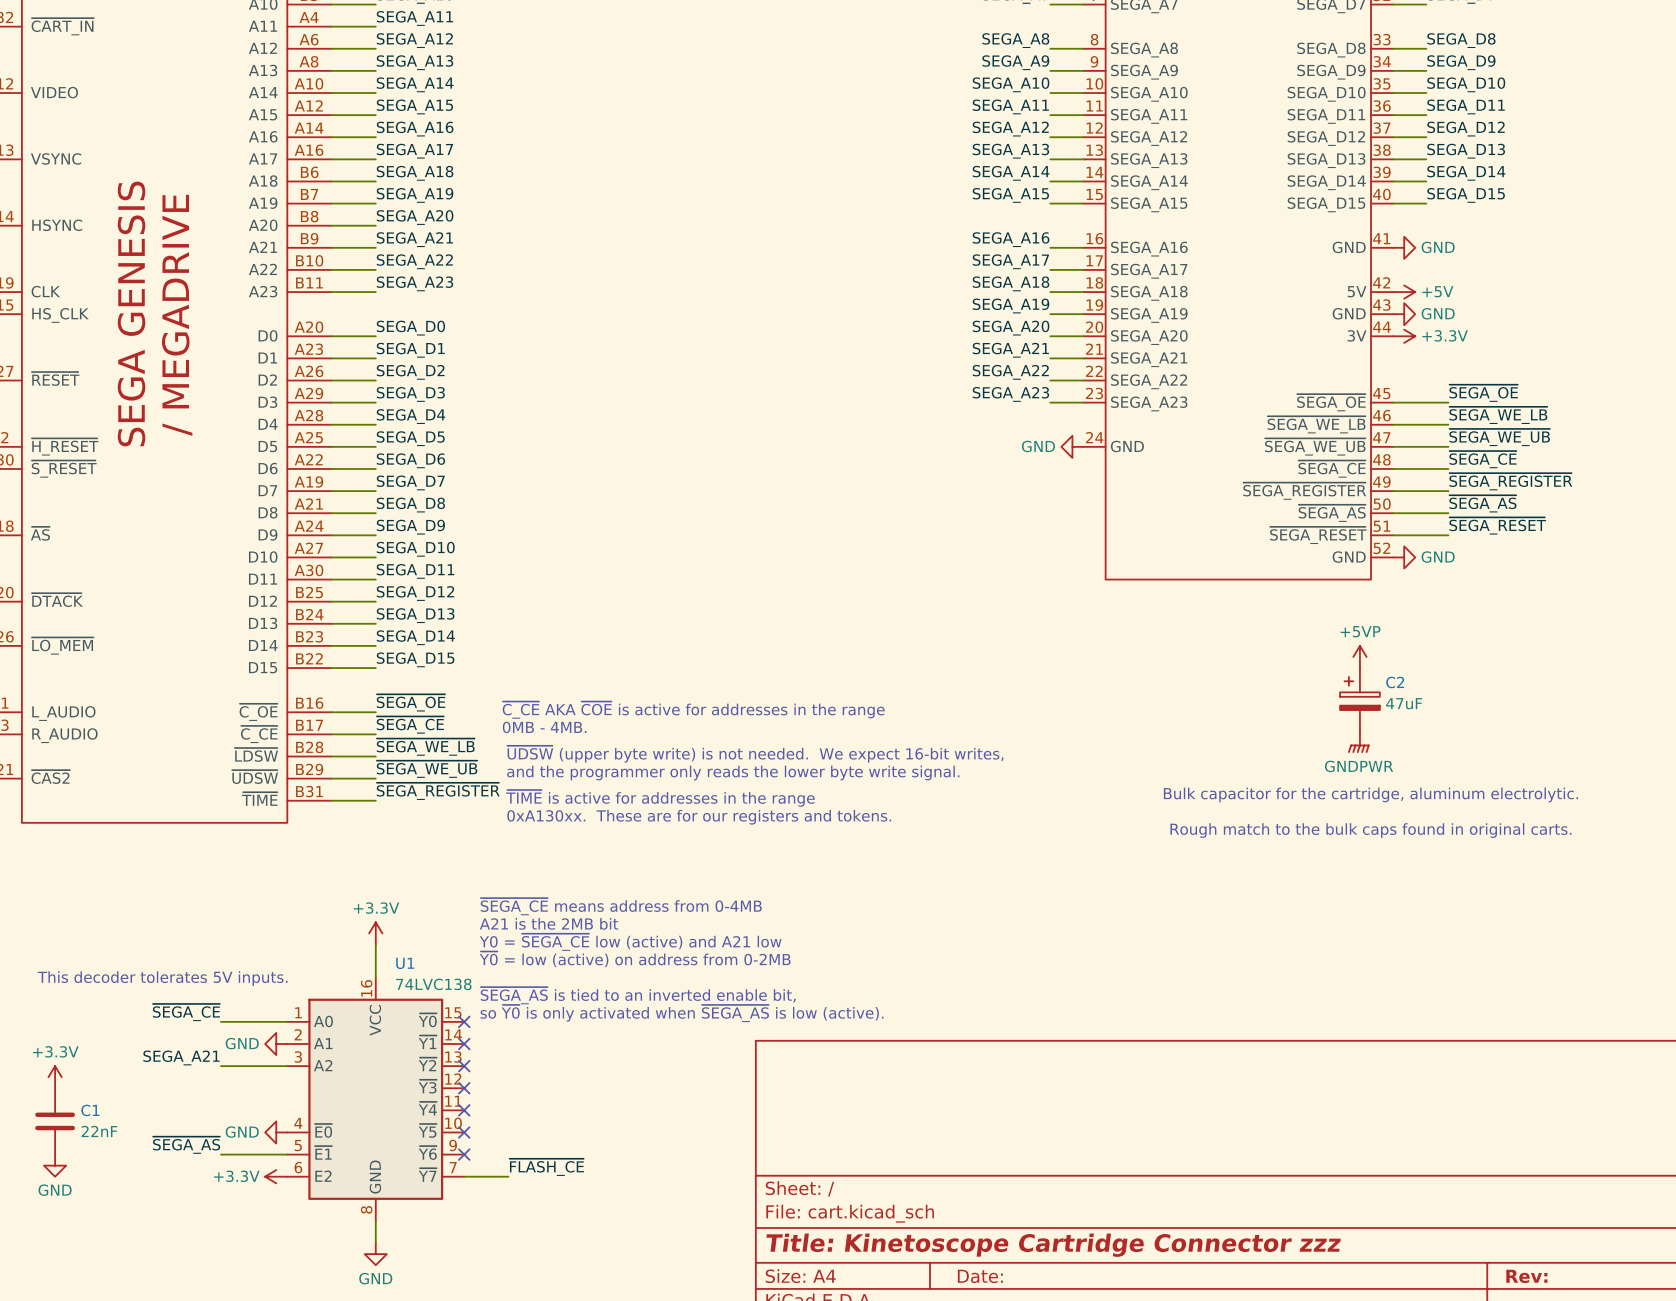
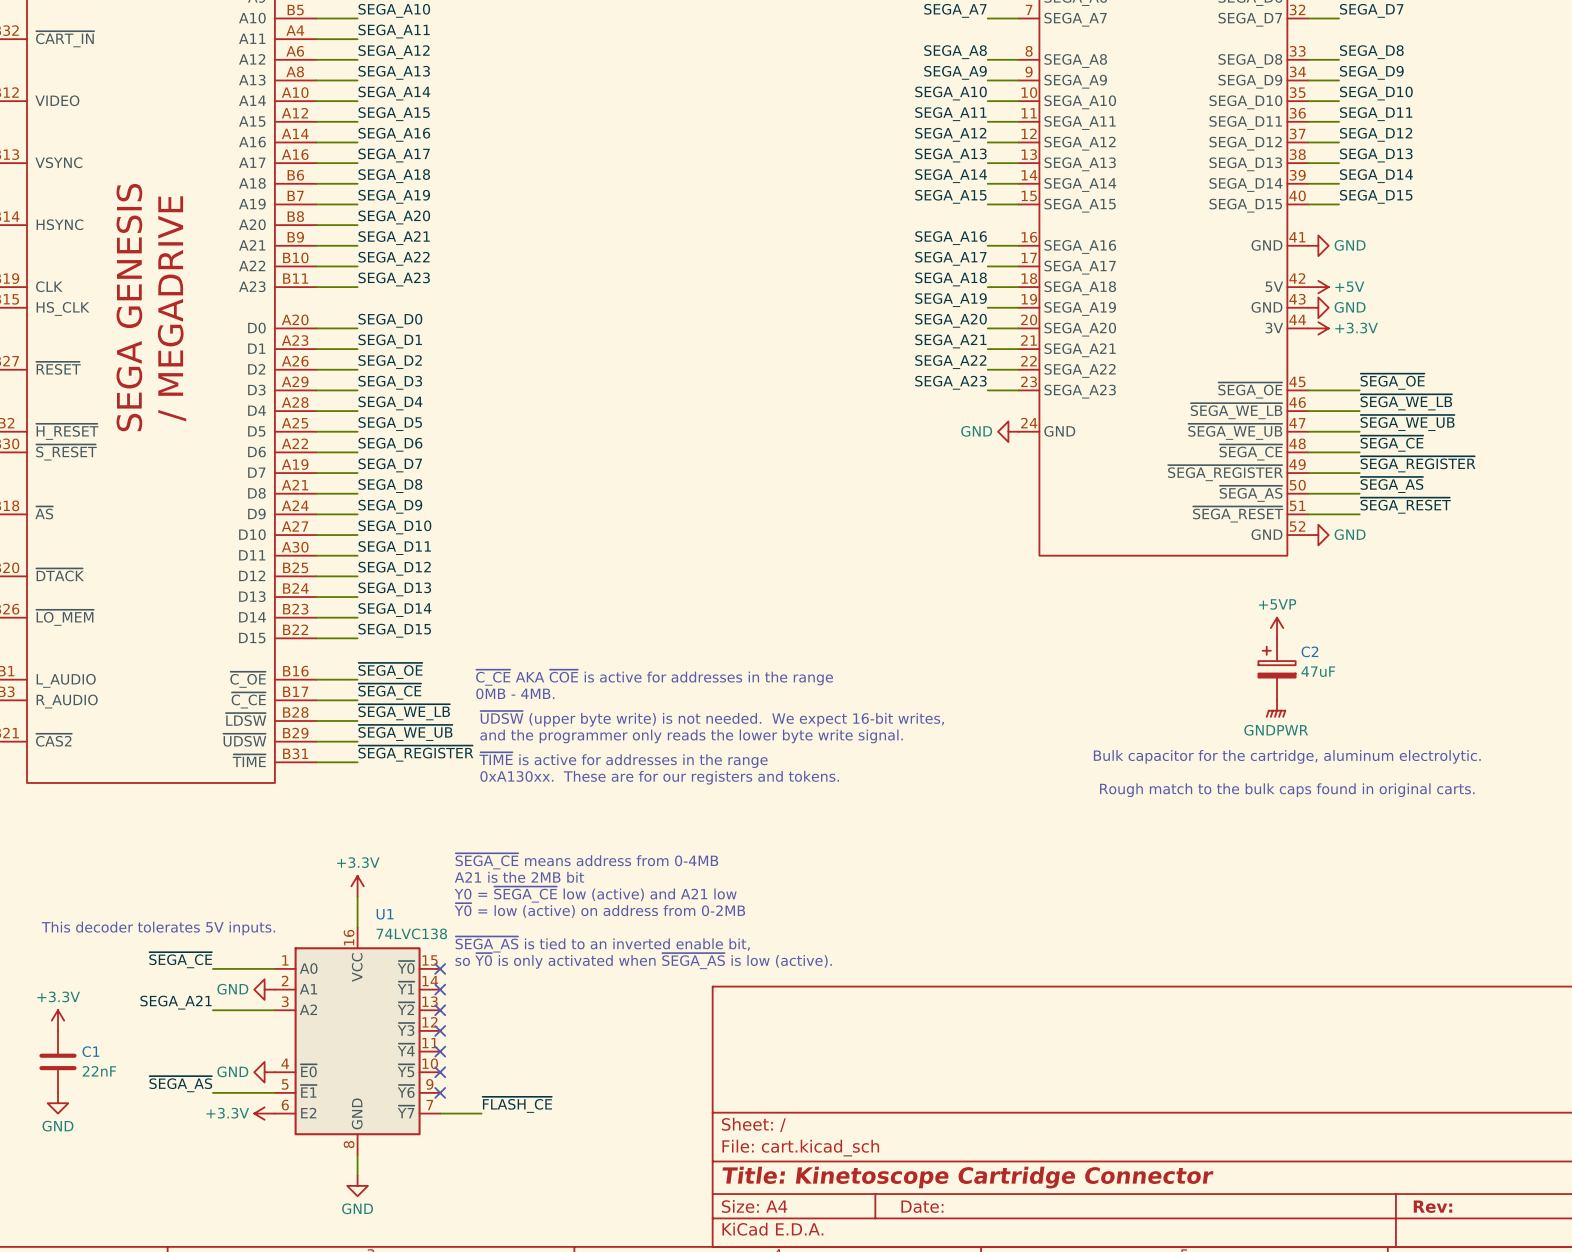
title block: Title: Kinetoscope Cartridge Connector zzz (1053, 1245) -> Title: Kinetoscope Cartridge Connector (967, 1177)

